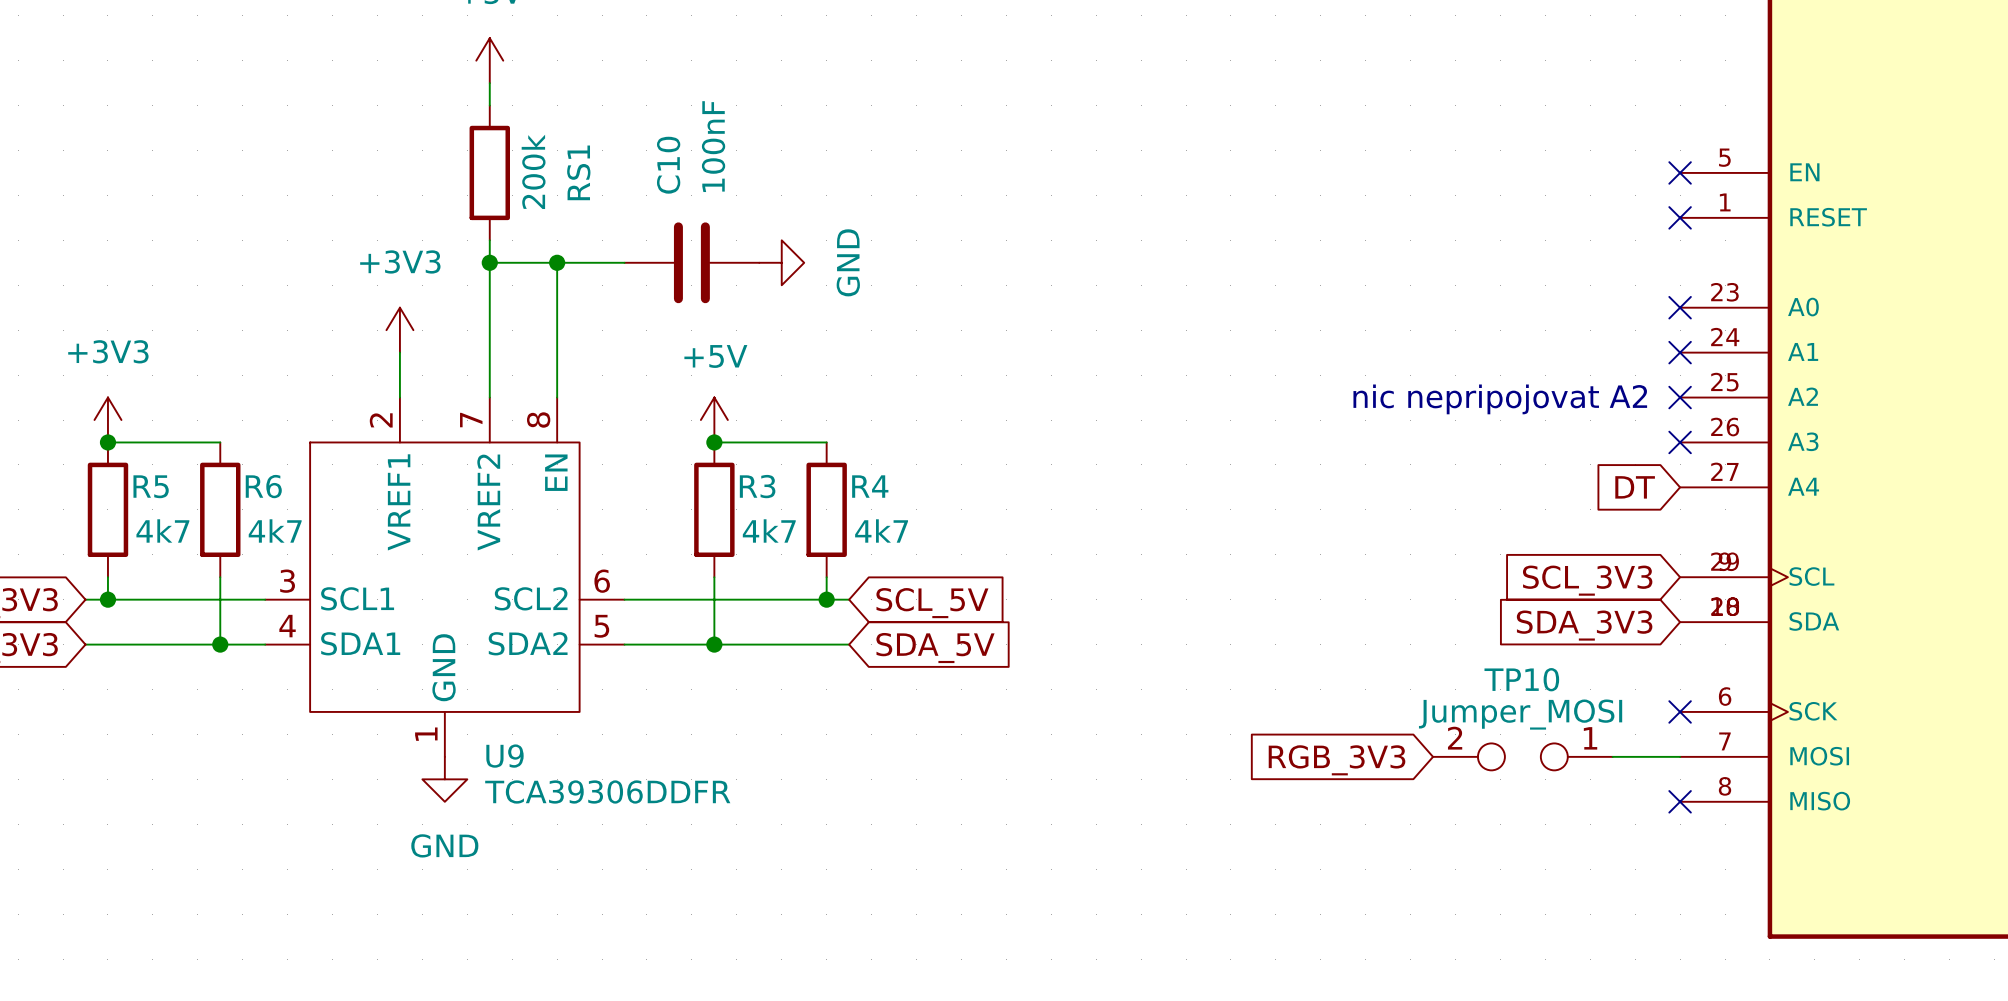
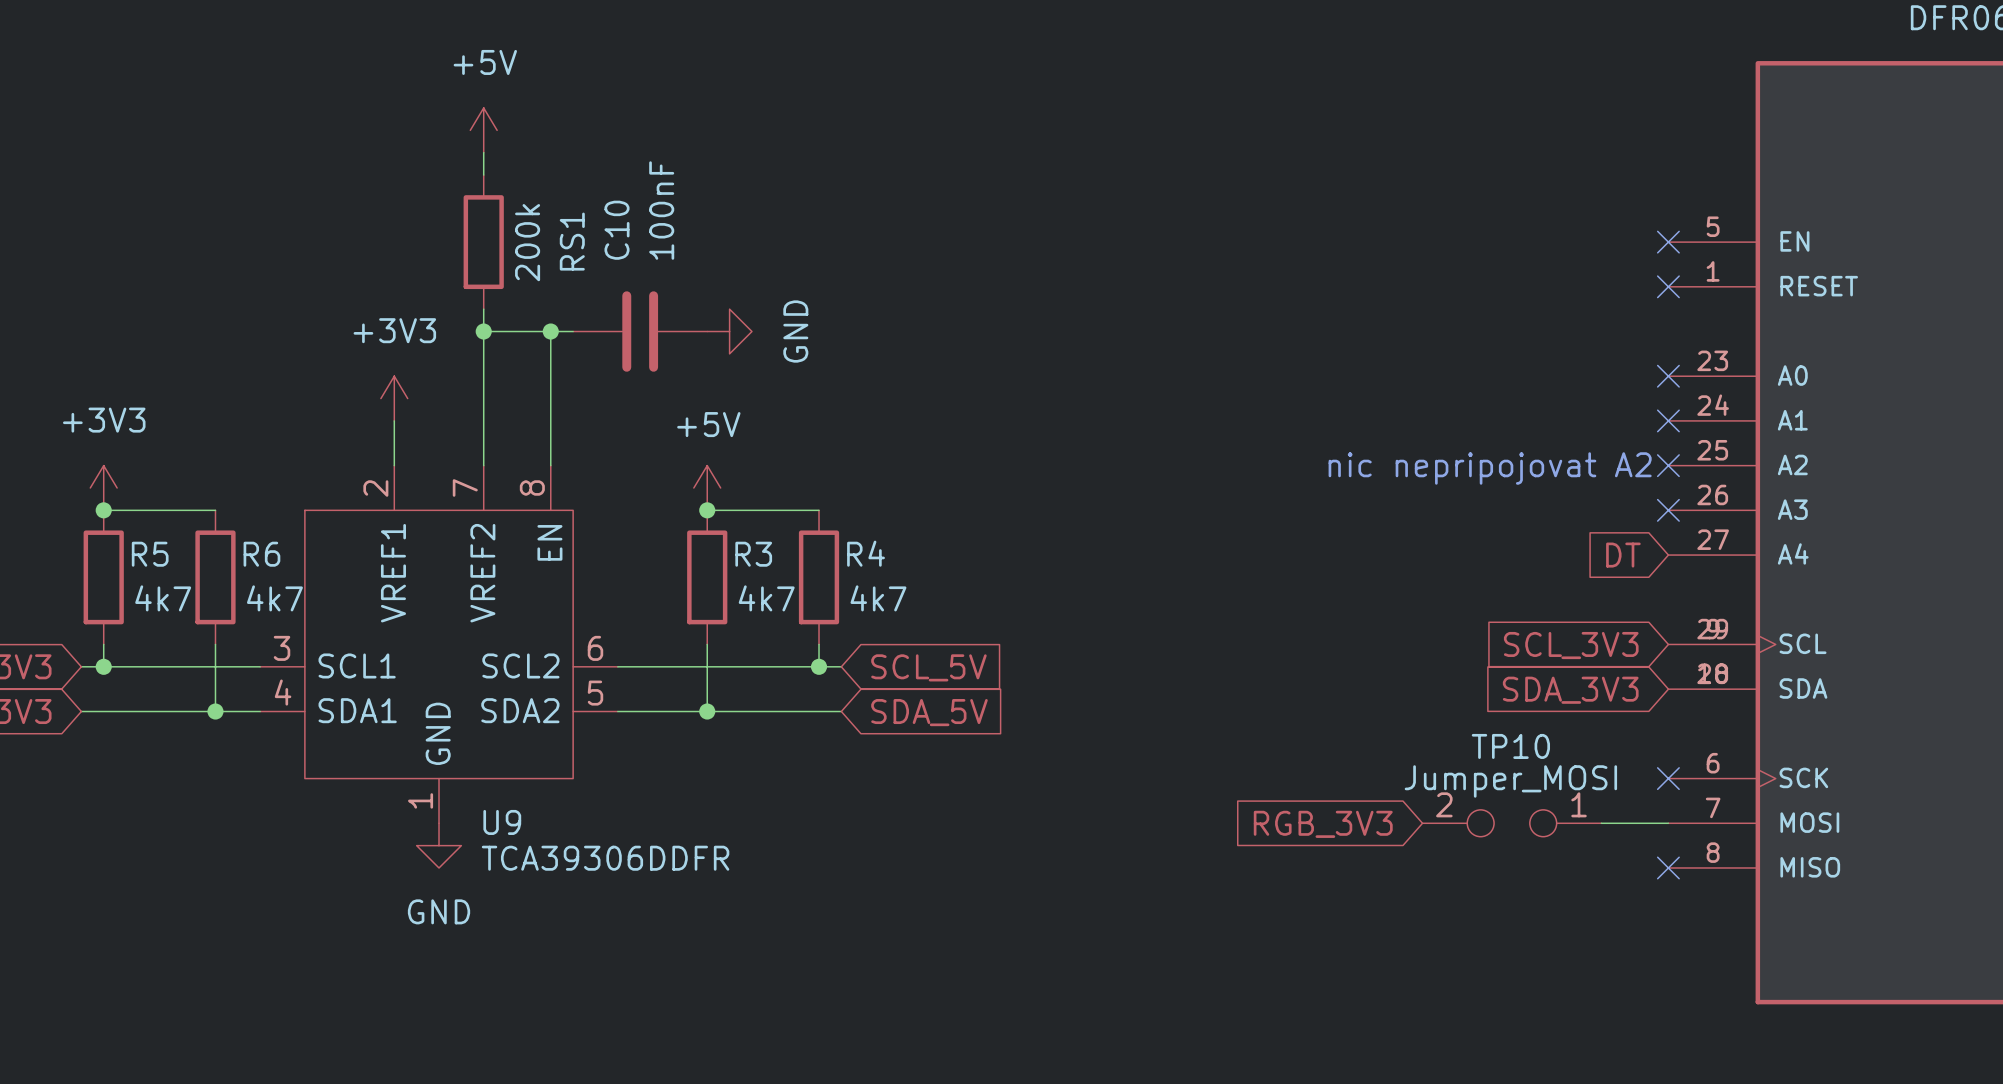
C10 position: (691, 262) -> (640, 331)
power symbol position: GND (781, 262) -> GND (729, 331)

